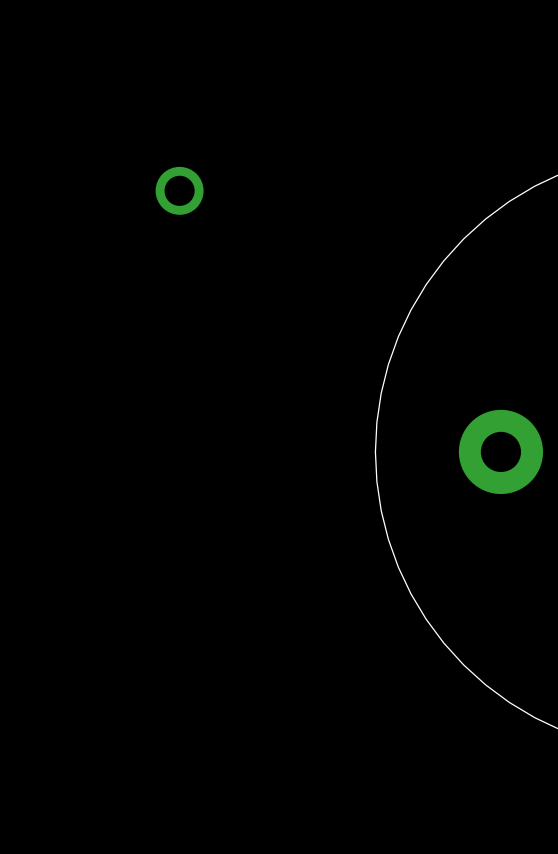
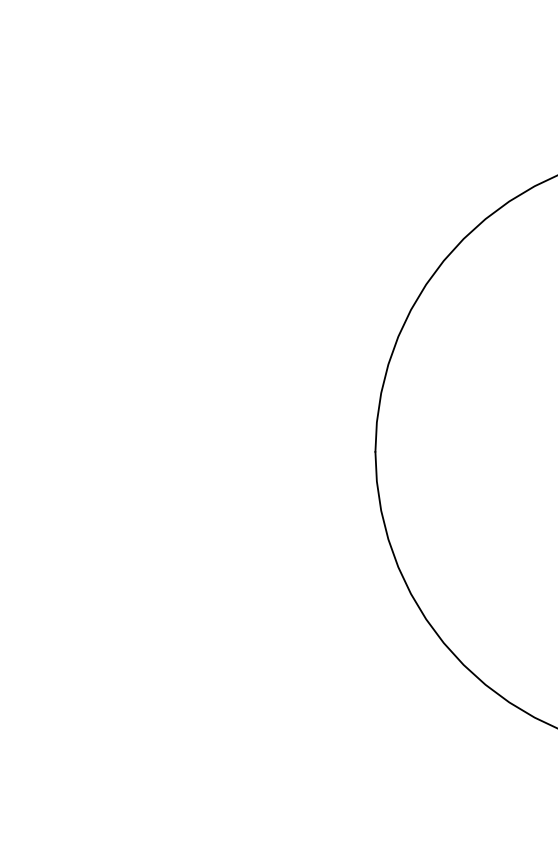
via: (179, 190) -> none
part: (500, 451) -> none

